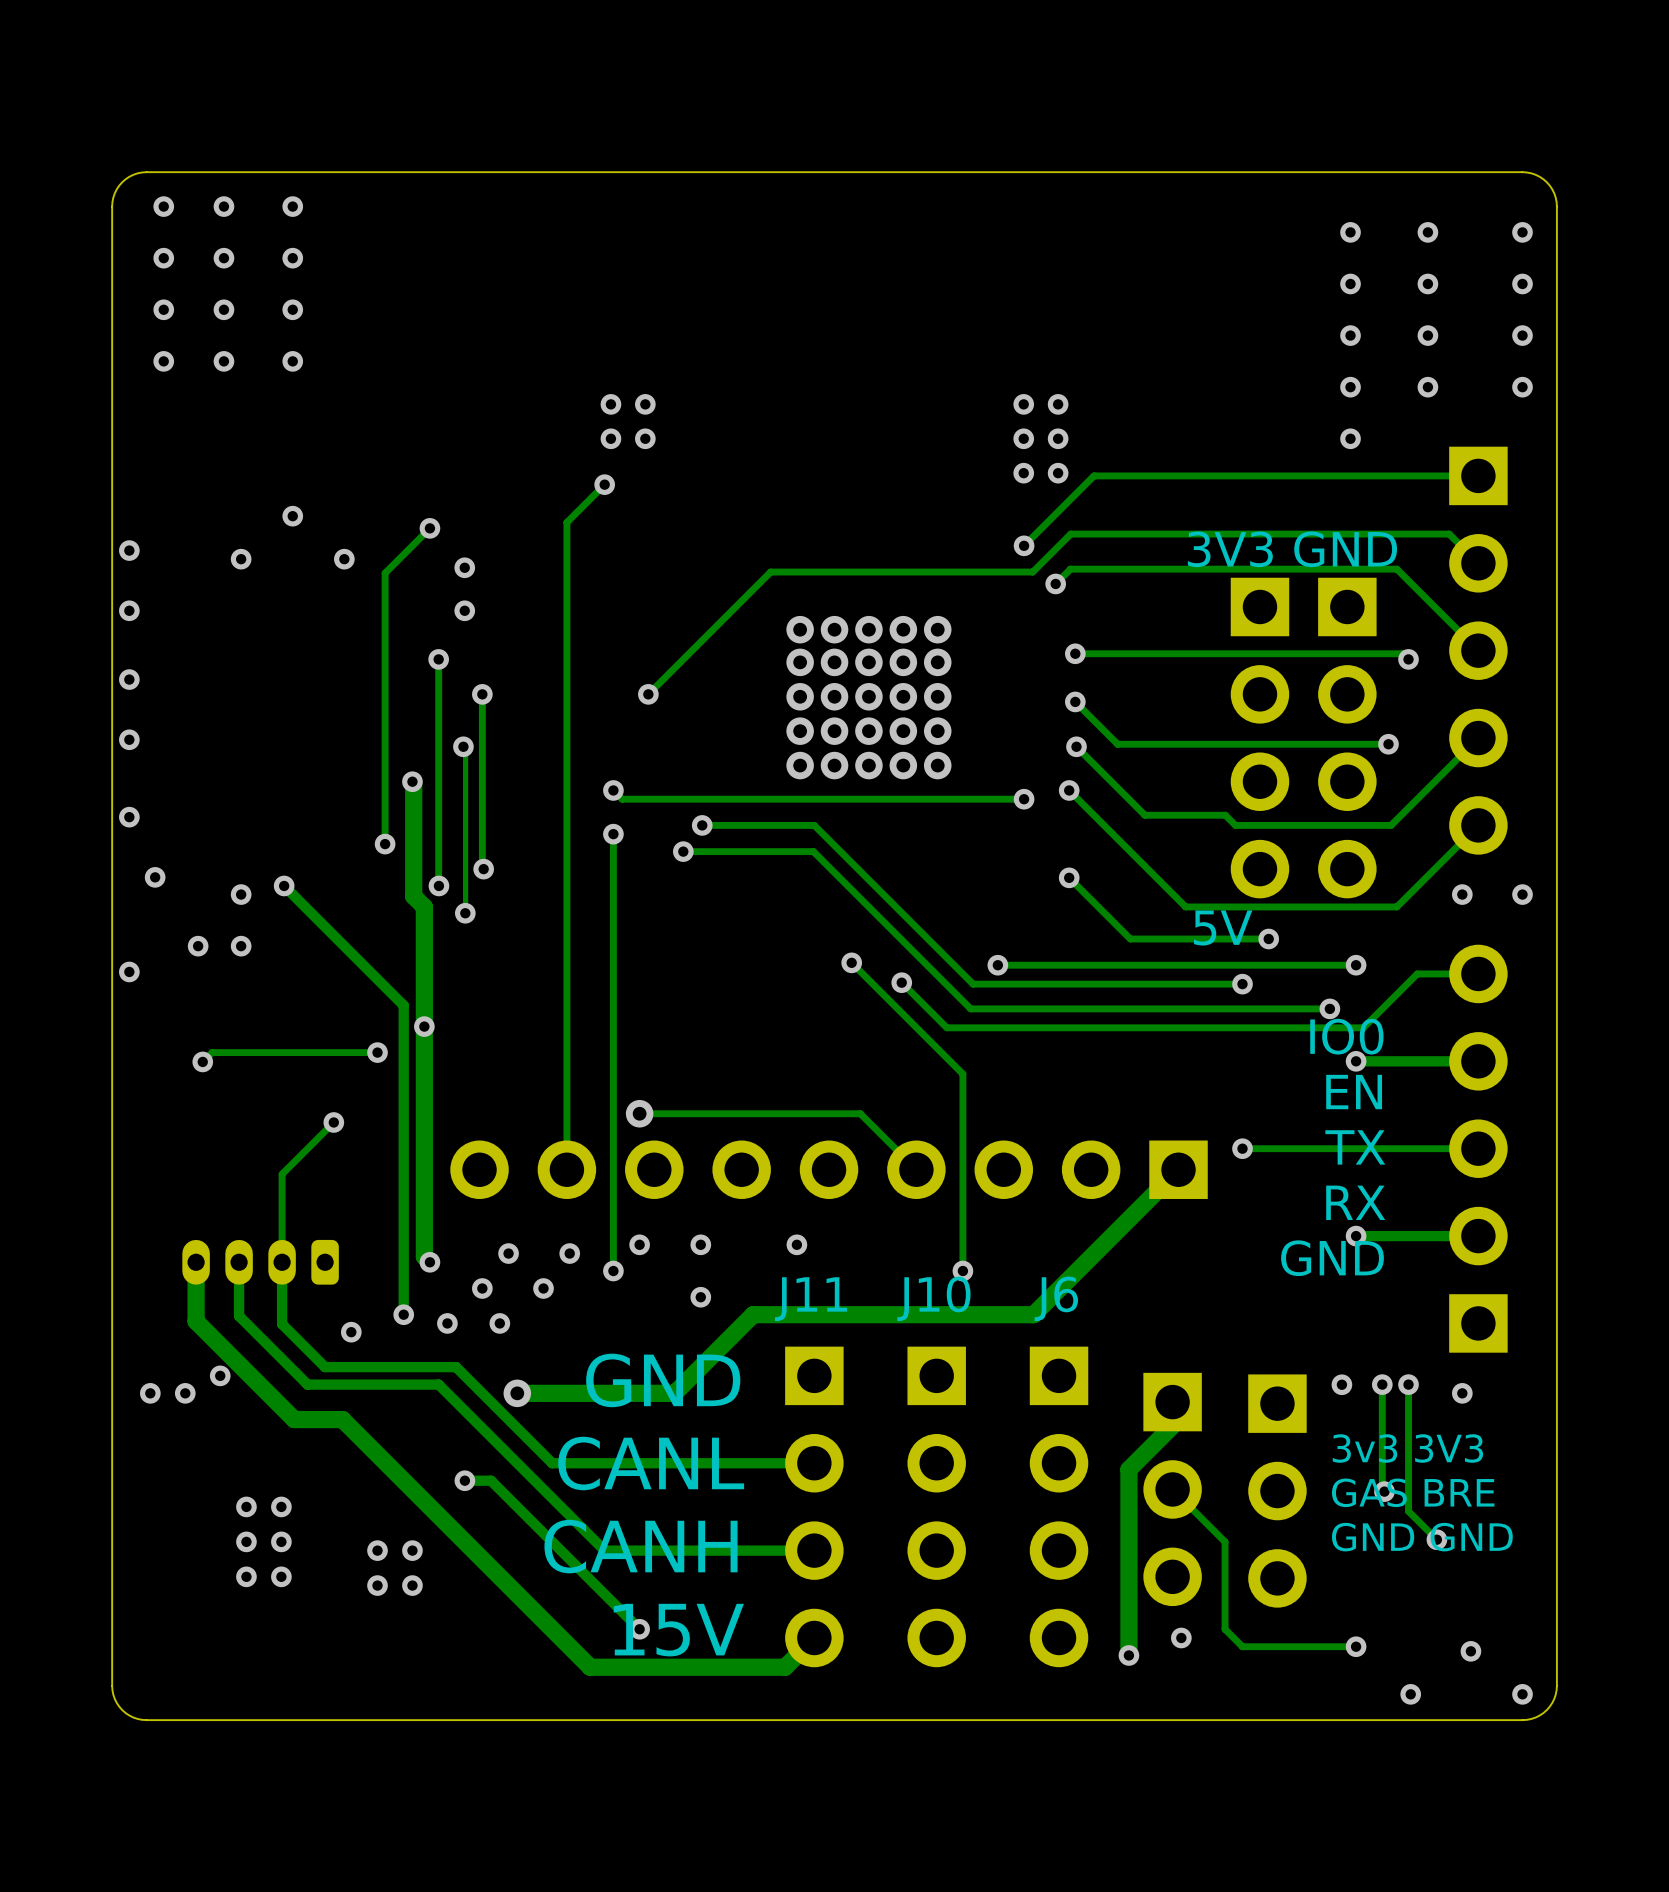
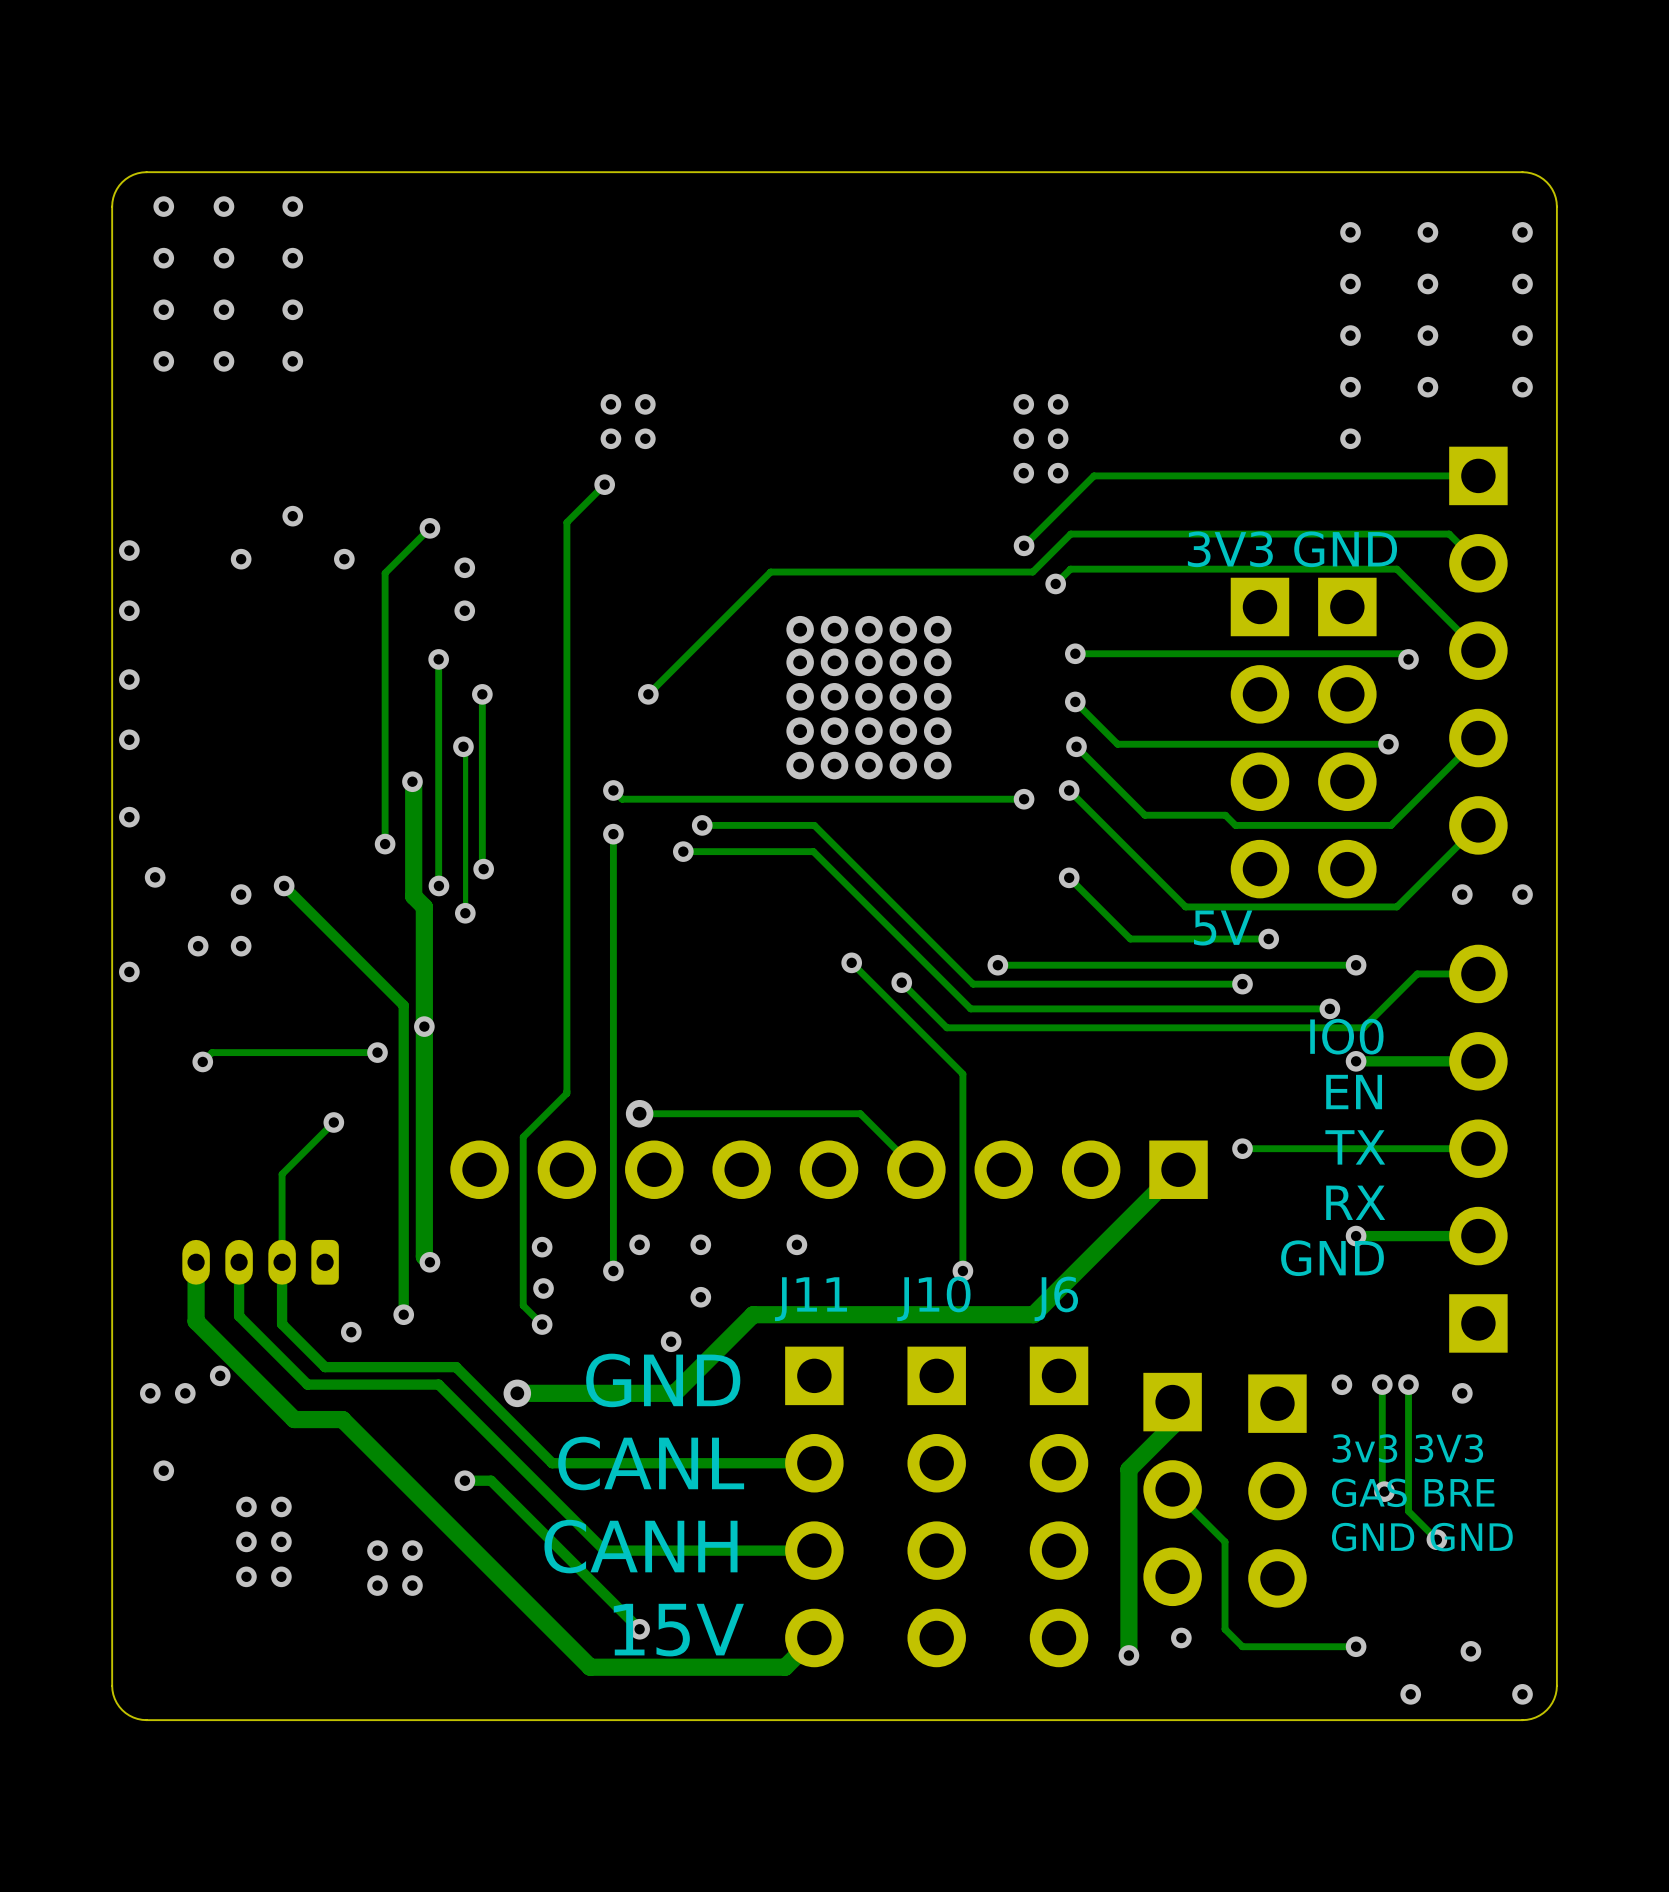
track: (566, 1093) (566, 1169) -> (566, 1093) (523, 1137) (523, 1305) (542, 1324)
via: none -> (542, 1247)
via: (508, 1253) -> none
via: (569, 1253) -> none
via: (482, 1288) -> none
via: (447, 1323) -> none
via: (499, 1323) -> none
via: none -> (542, 1324)
via: none -> (671, 1341)
via: none -> (163, 1470)

